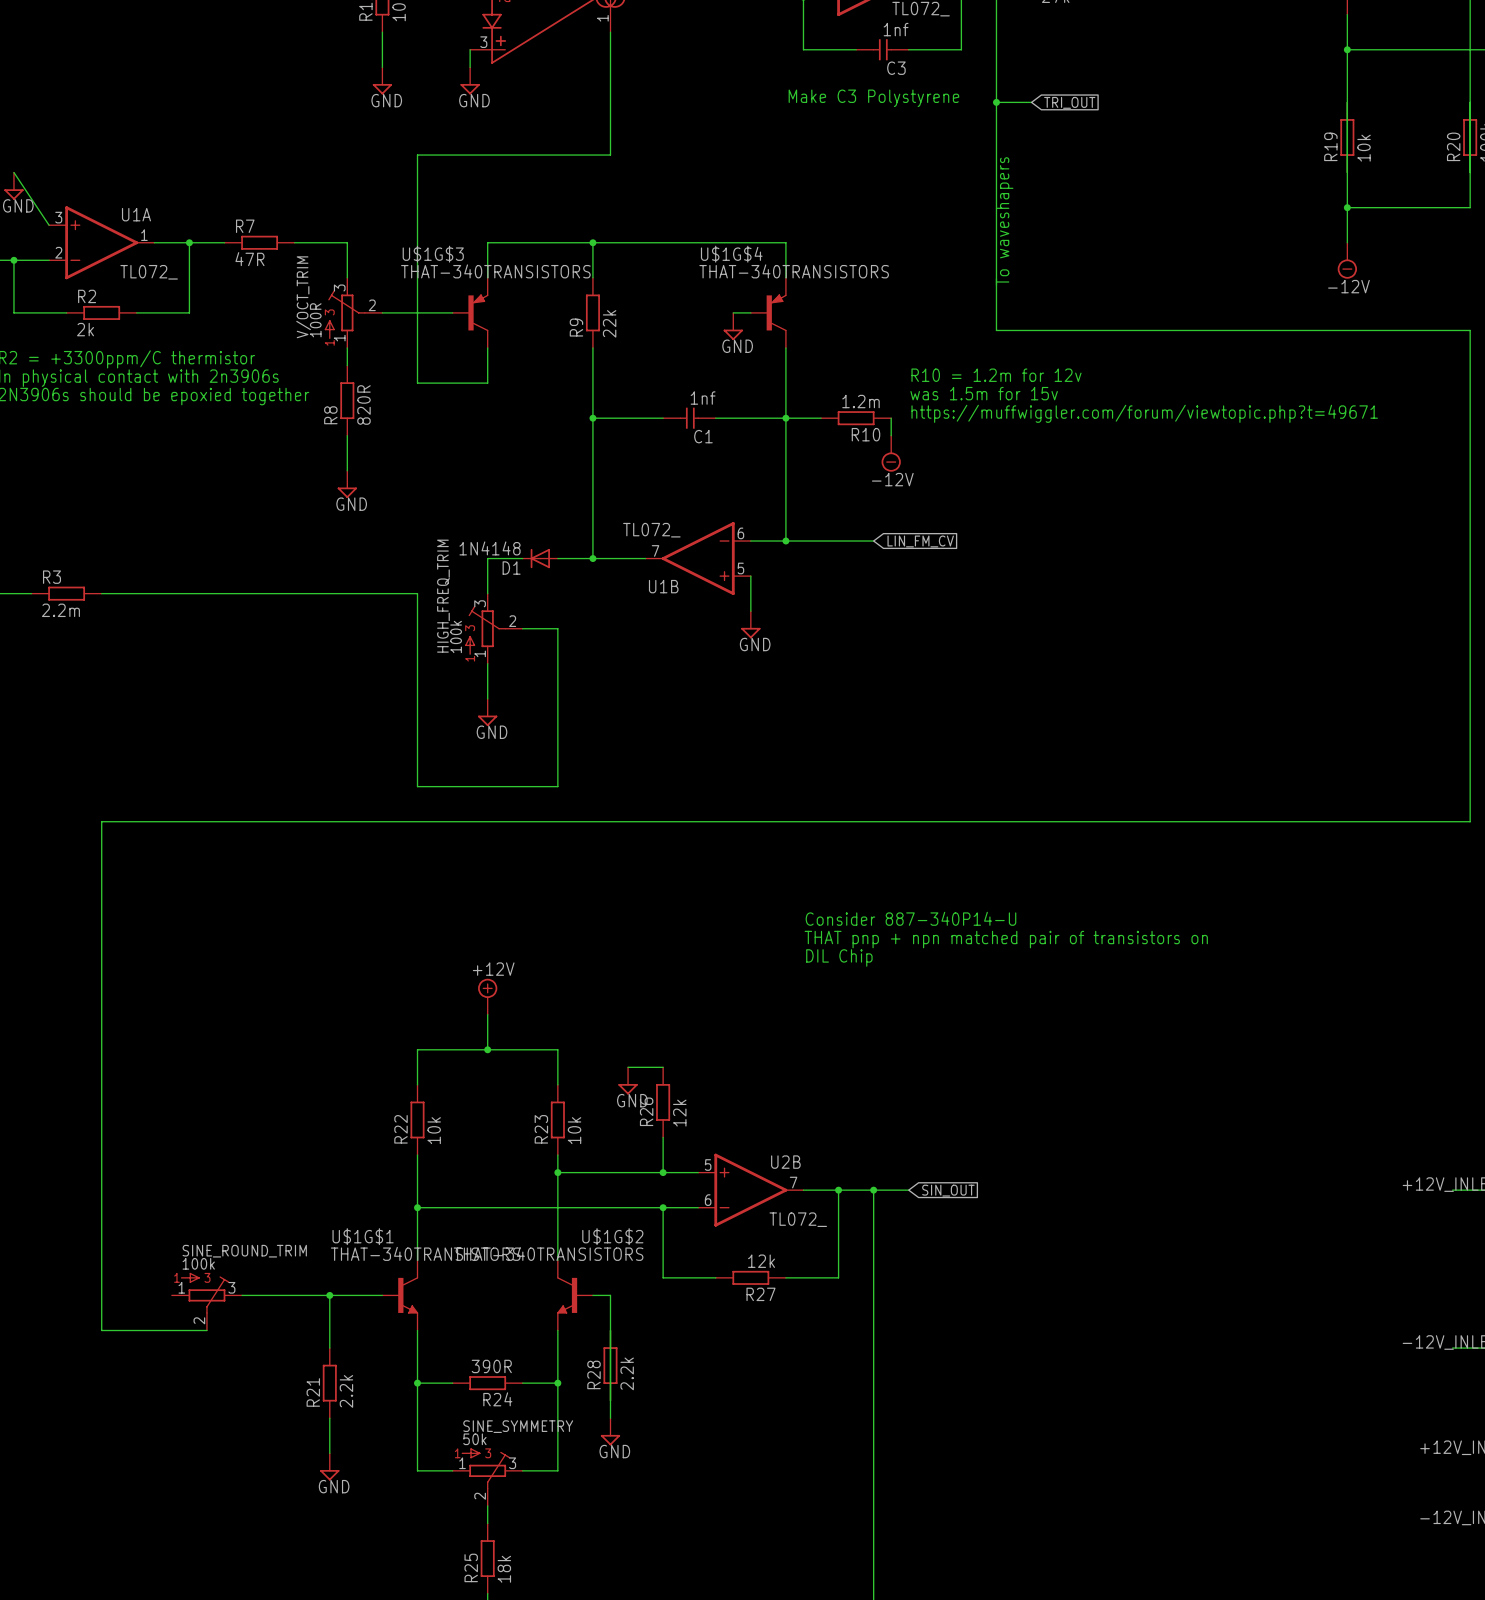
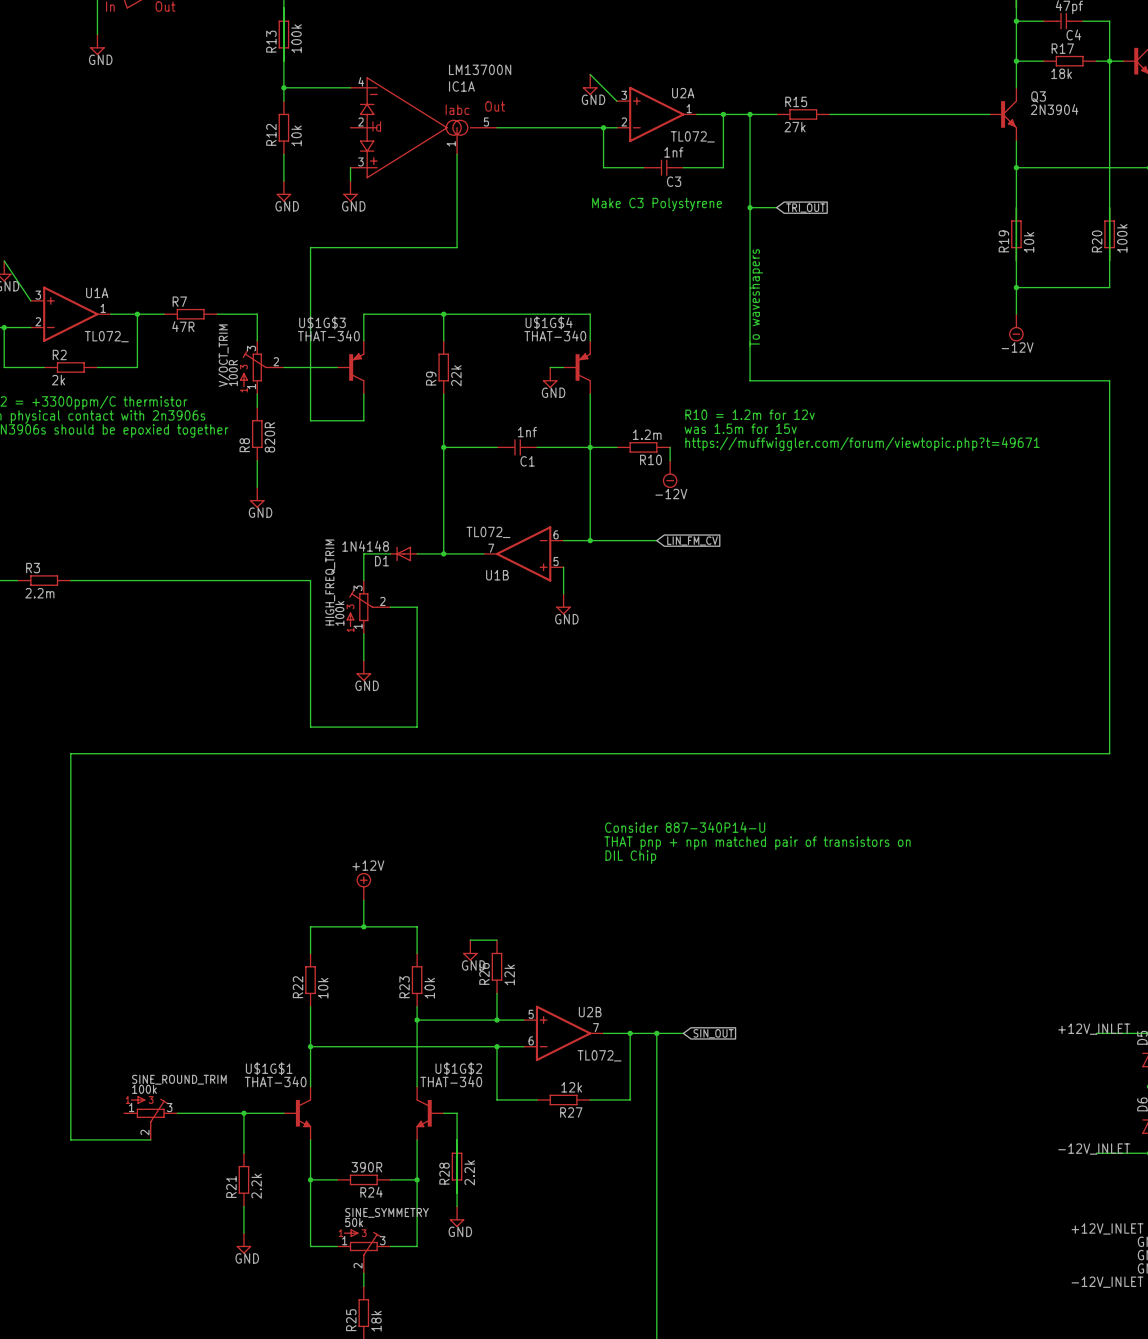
U$1G$3 value: THAT-340TRANSISTORS (495, 271) -> THAT-340 (328, 335)
U$1G$4 value: THAT-340TRANSISTORS (794, 271) -> THAT-340 (555, 335)
U$1G$1 value: THAT-340TRANSISTORS (425, 1253) -> THAT-340 (275, 1081)
U$1G$2 value: THAT-340TRANSISTORS (548, 1253) -> THAT-340 (451, 1081)

